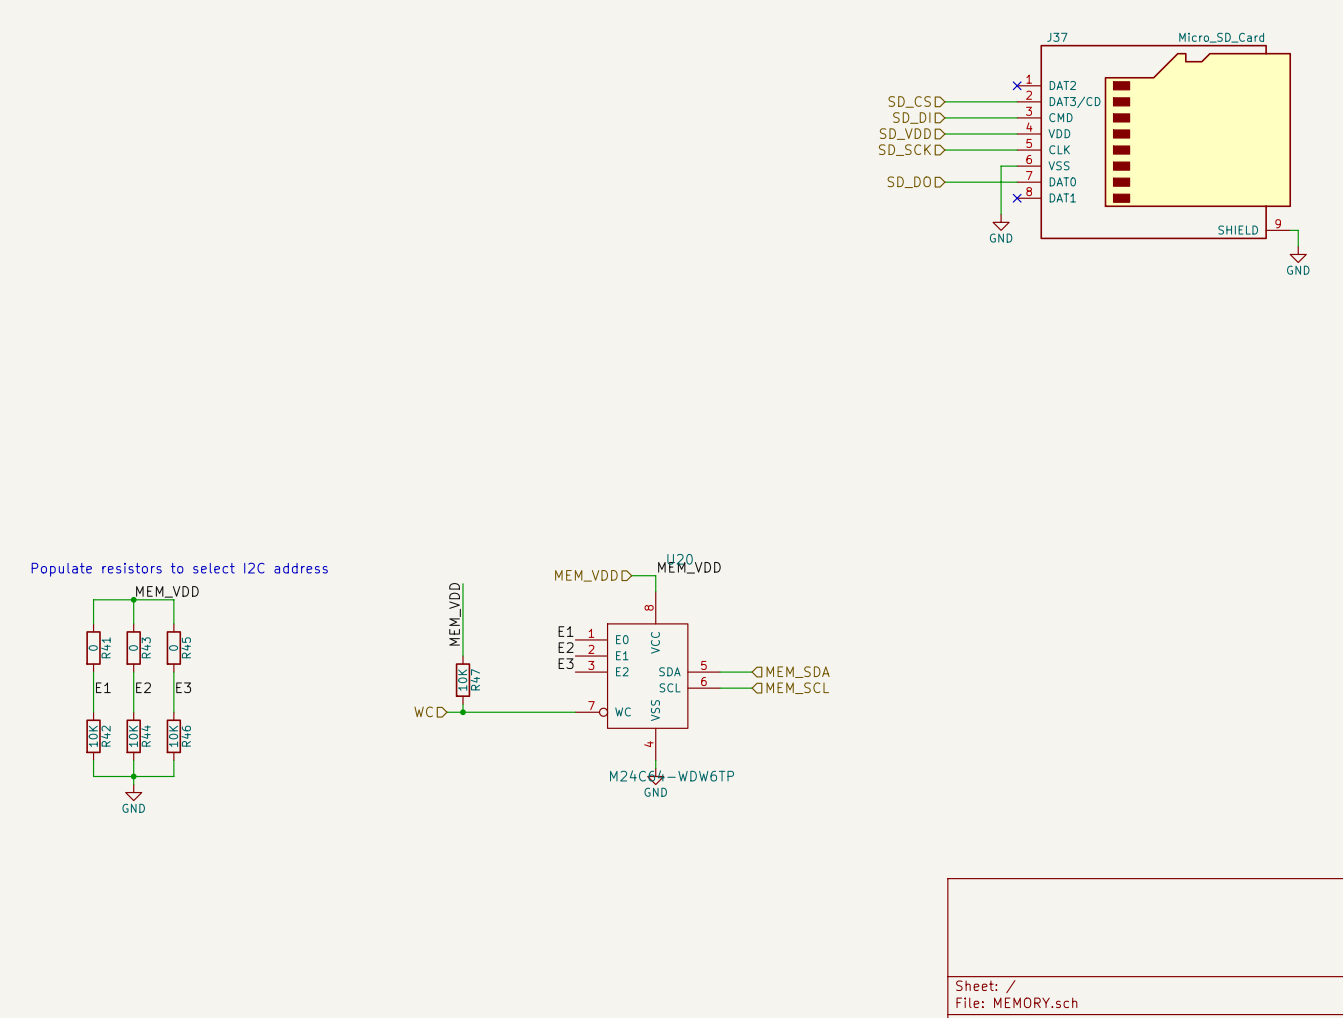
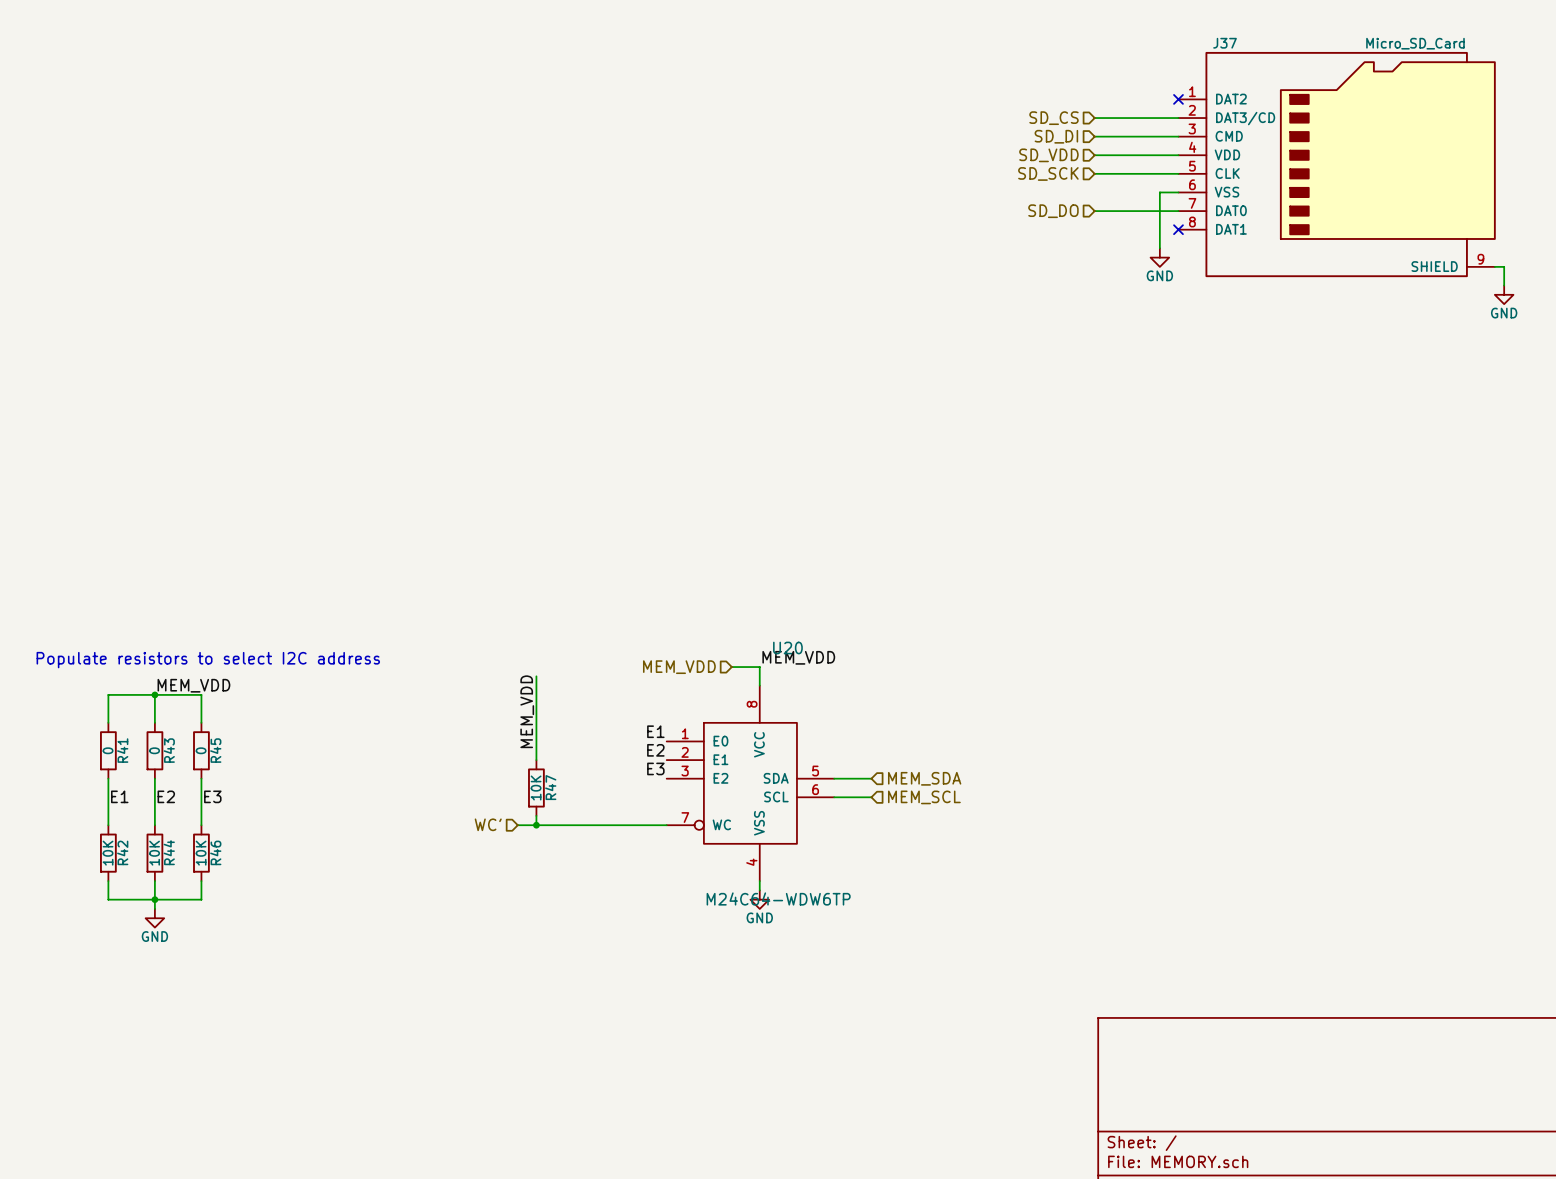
hierarchical label: WC (423, 711) -> WC' (488, 824)

